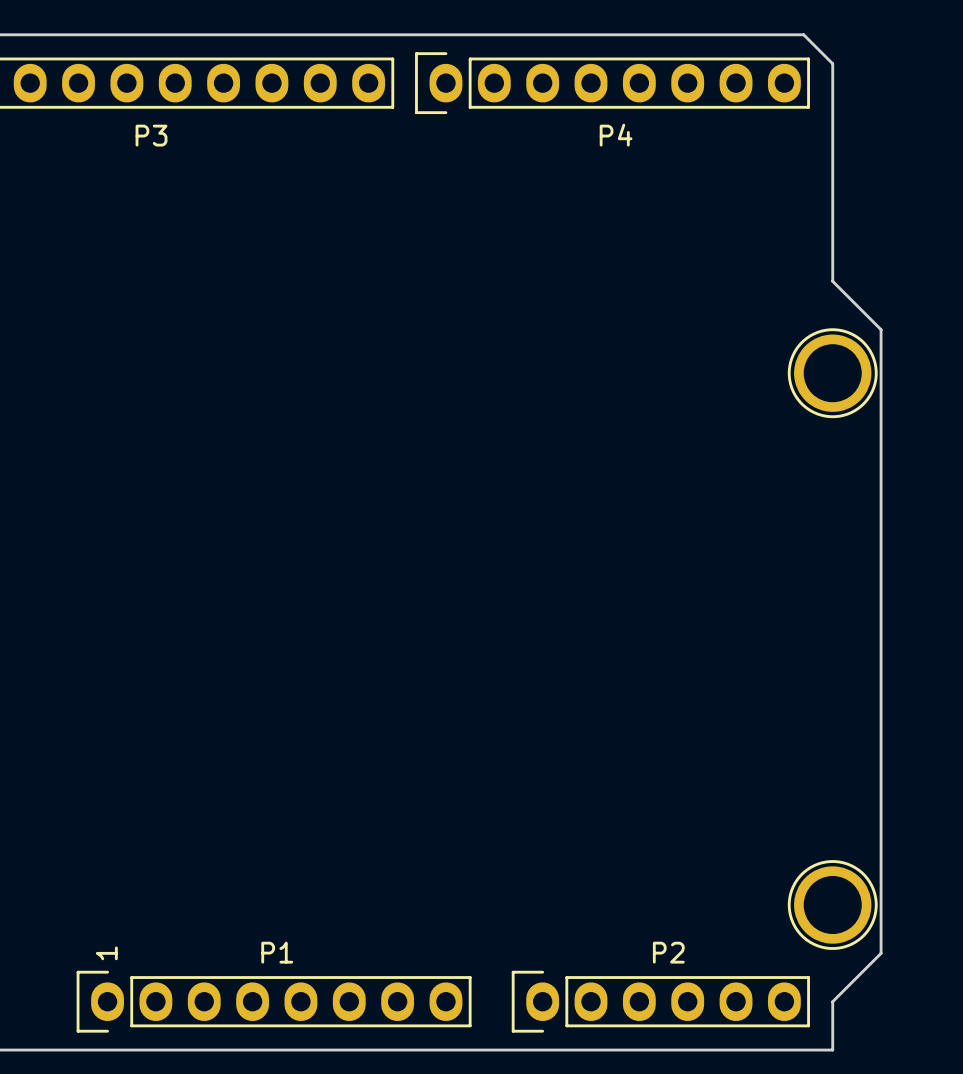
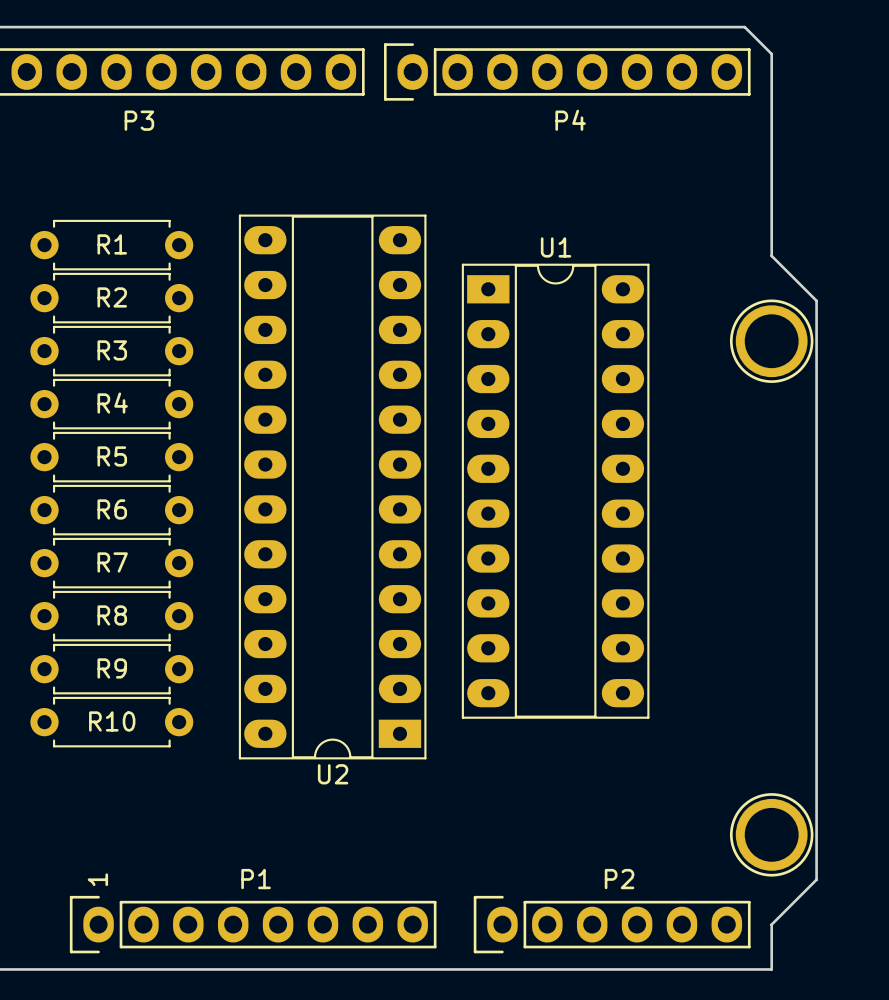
R1: none -> (111, 245)
R2: none -> (111, 298)
R3: none -> (111, 351)
R4: none -> (111, 404)
R5: none -> (111, 457)
U2: none -> (332, 486)
U1: none -> (555, 491)
R6: none -> (111, 510)
R7: none -> (111, 563)
R8: none -> (111, 616)
R9: none -> (111, 669)
R10: none -> (111, 722)

